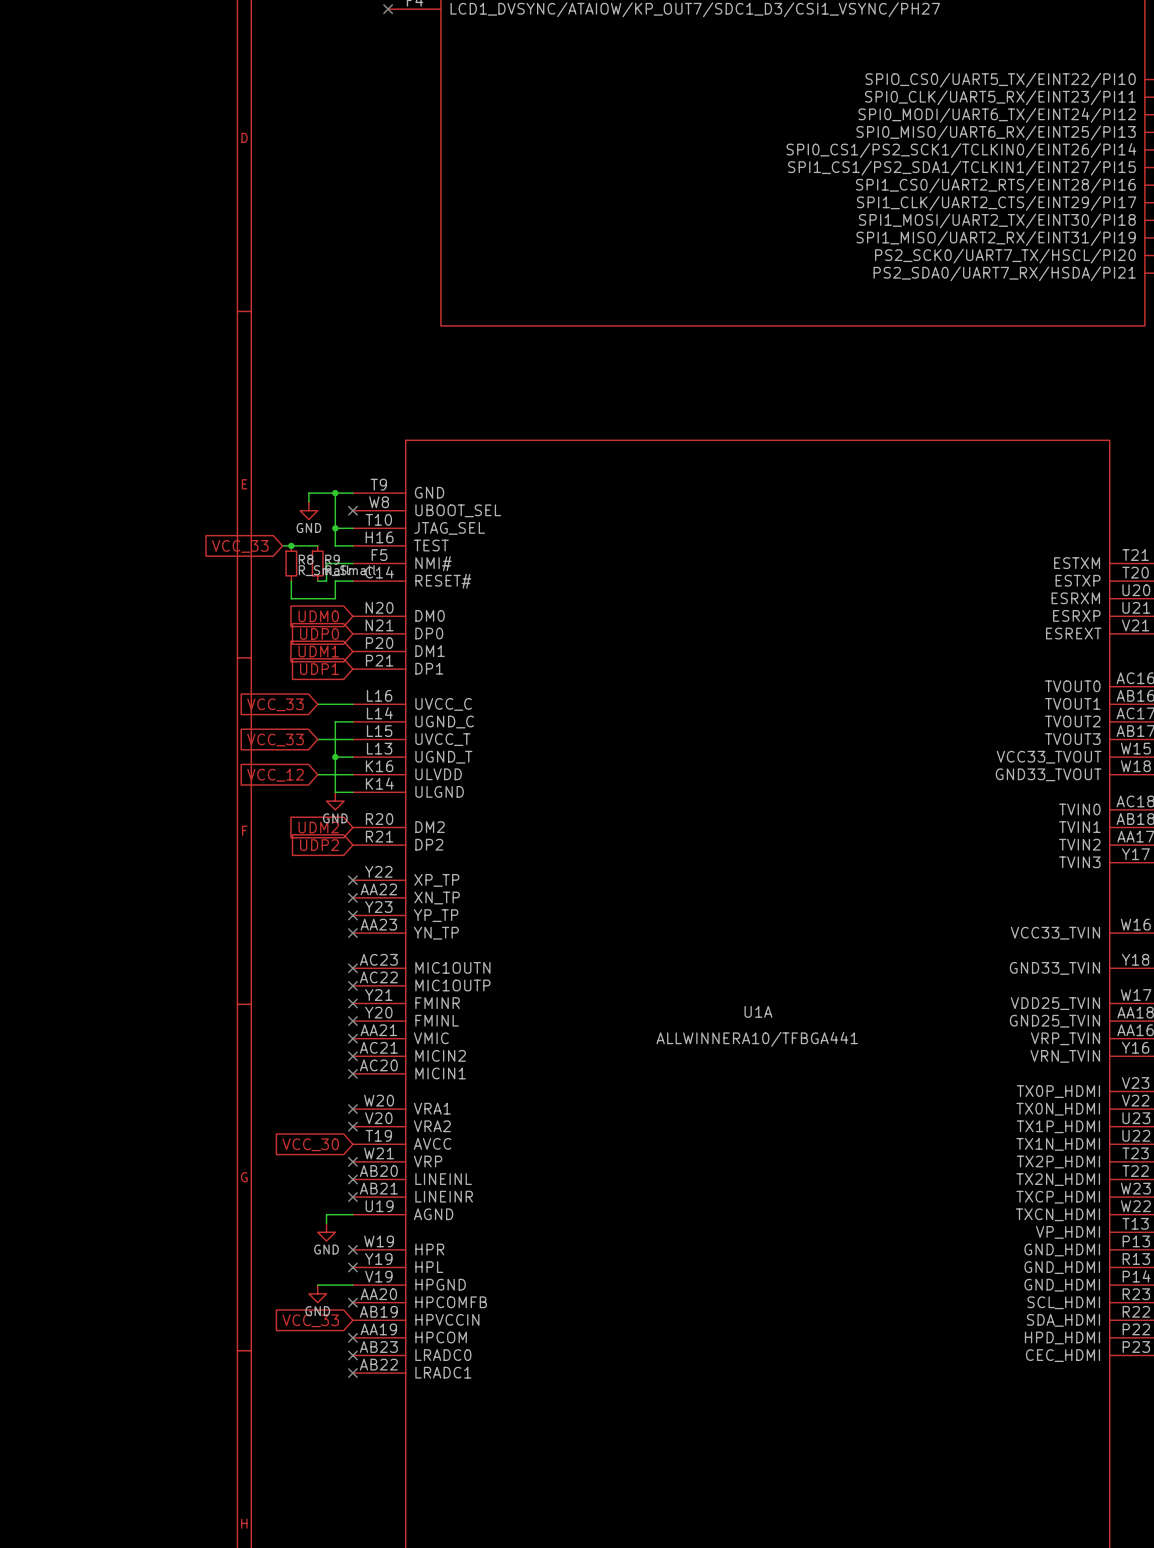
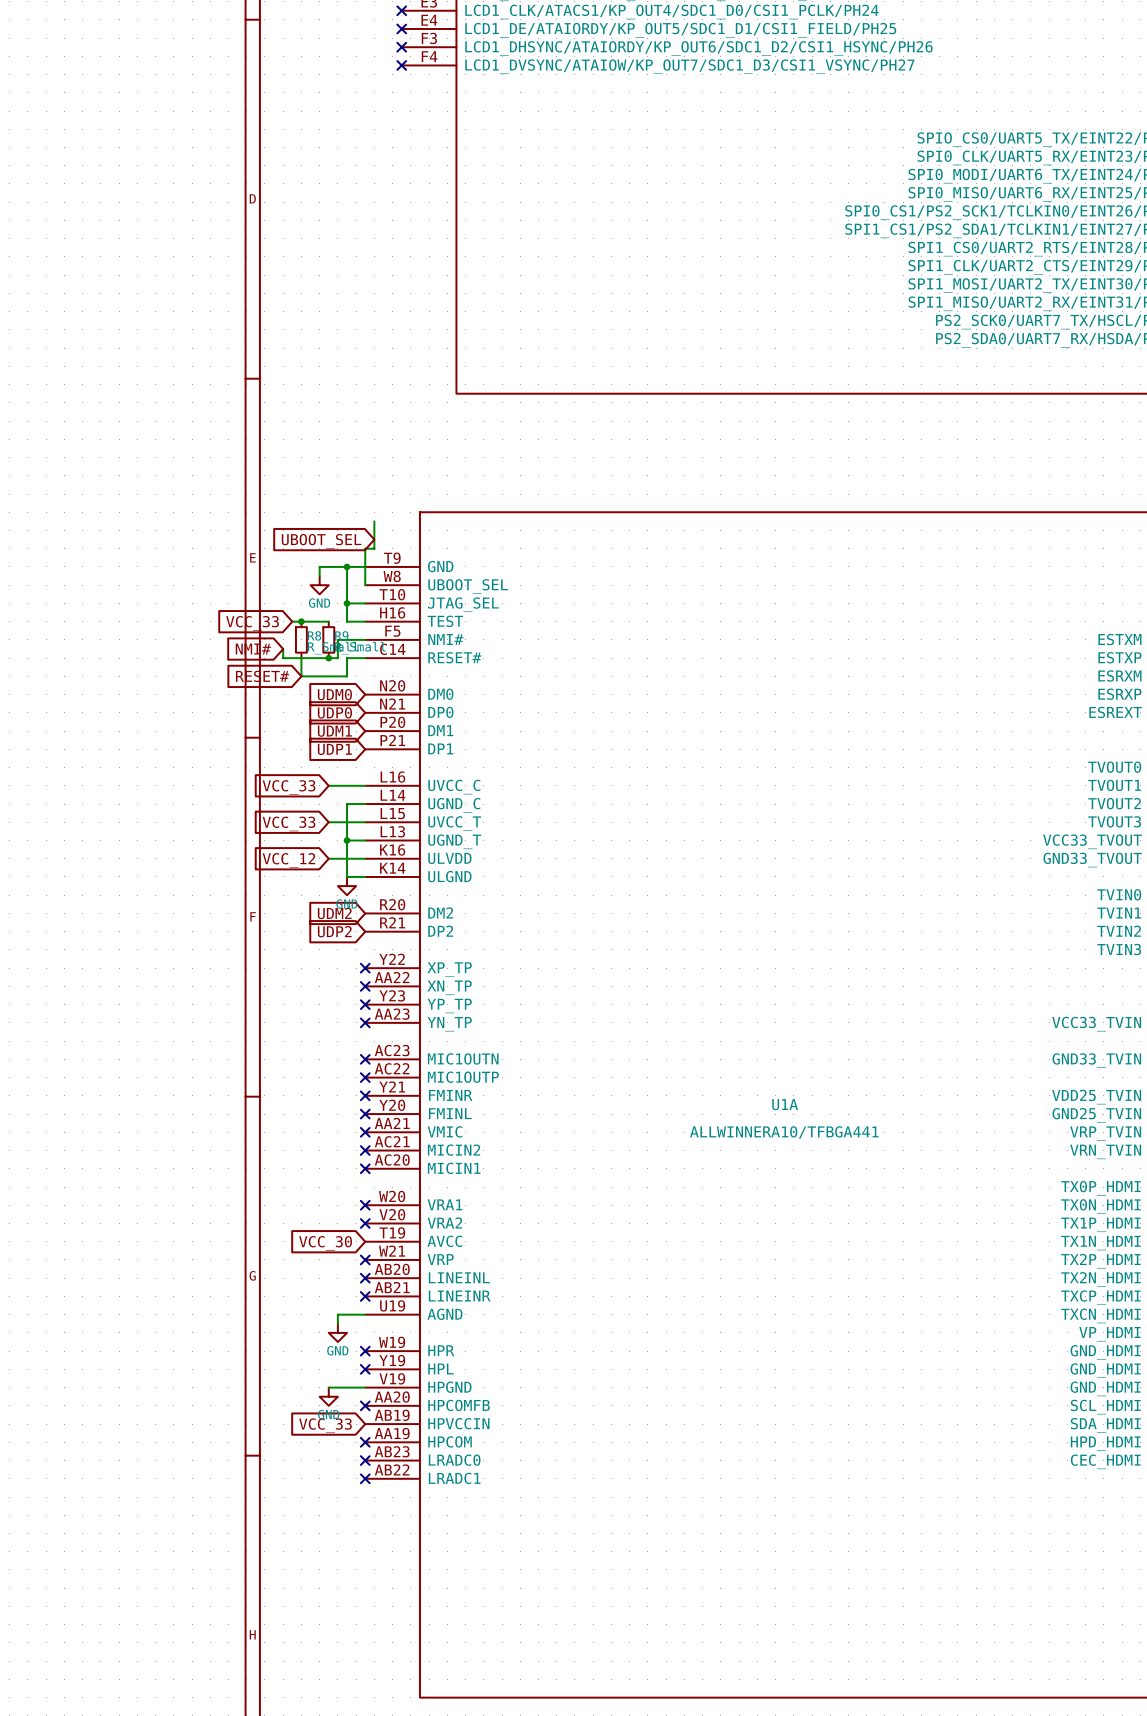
wire: none -> (374, 521) (374, 548) (365, 548) (365, 585)
global label: none -> UBOOT_SEL (321, 541)
no-connect mark: (352, 510) -> none
global label: none -> NMI# (253, 649)
wire: none -> (283, 649) (283, 658) (328, 658)
junction: none -> (328, 658)
global label: none -> RESET# (262, 676)

